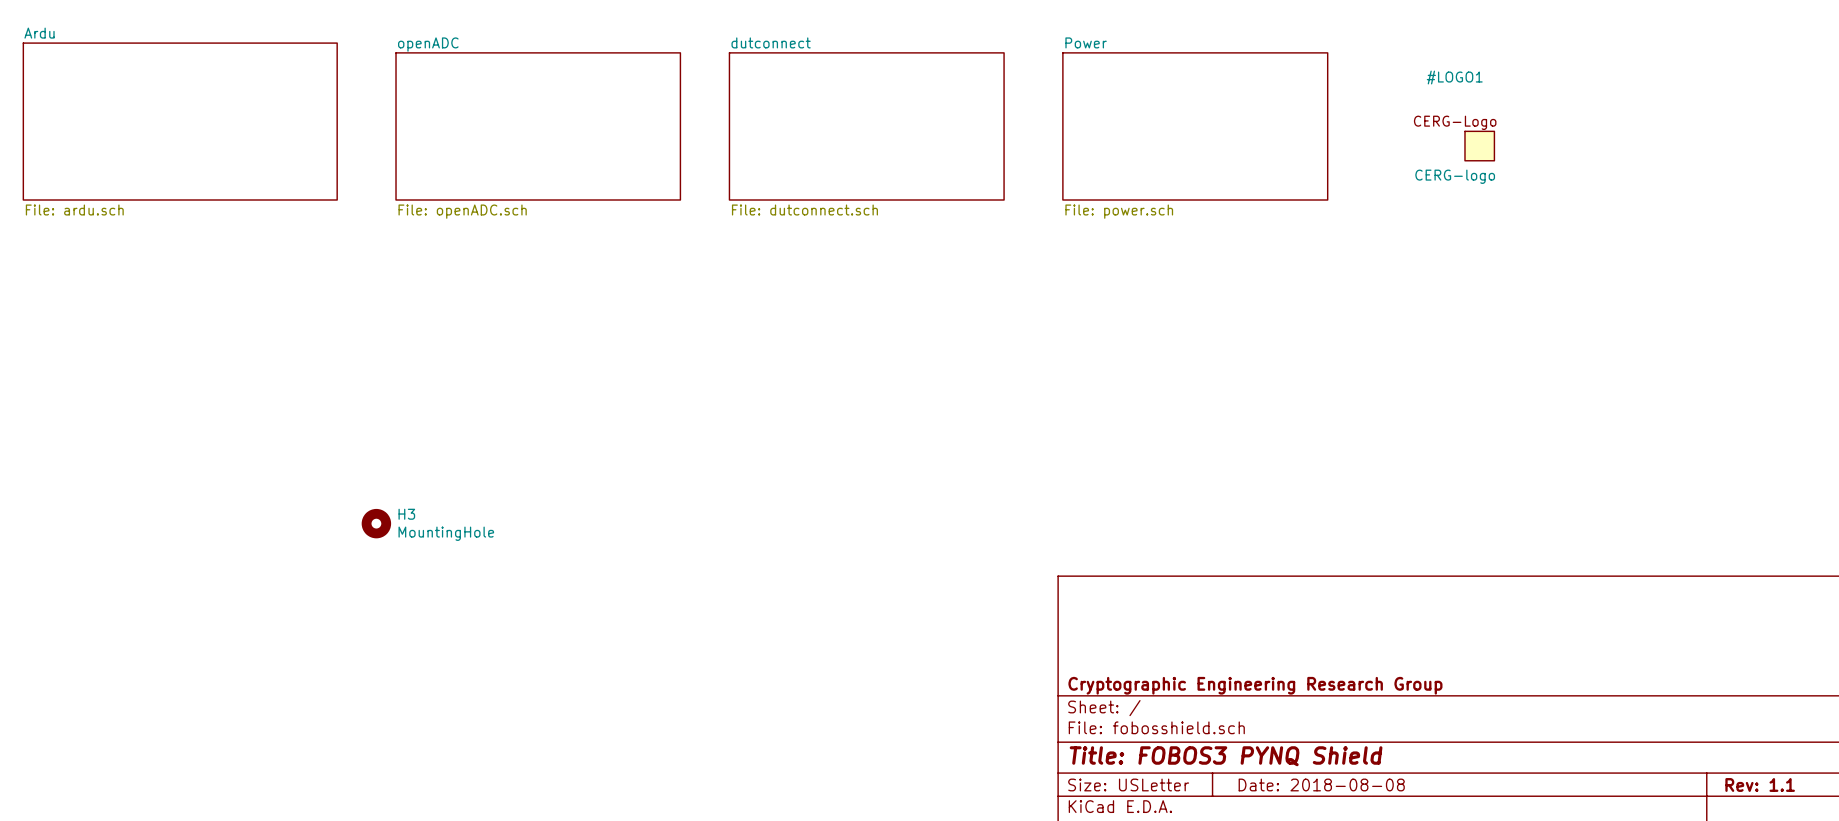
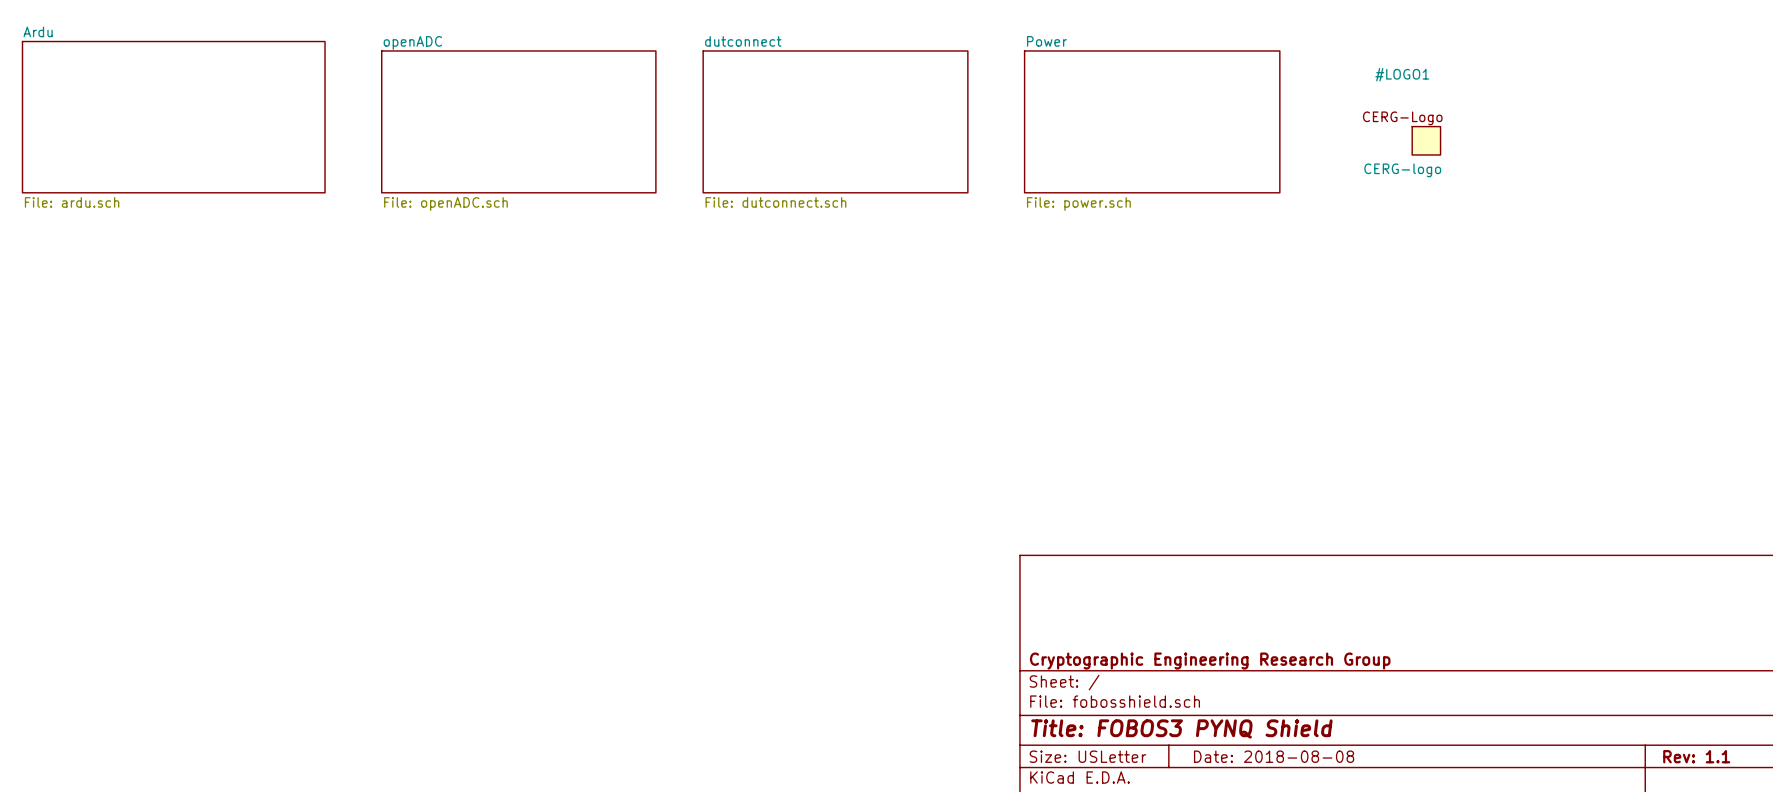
H3: MountingHole (376, 523) -> none

